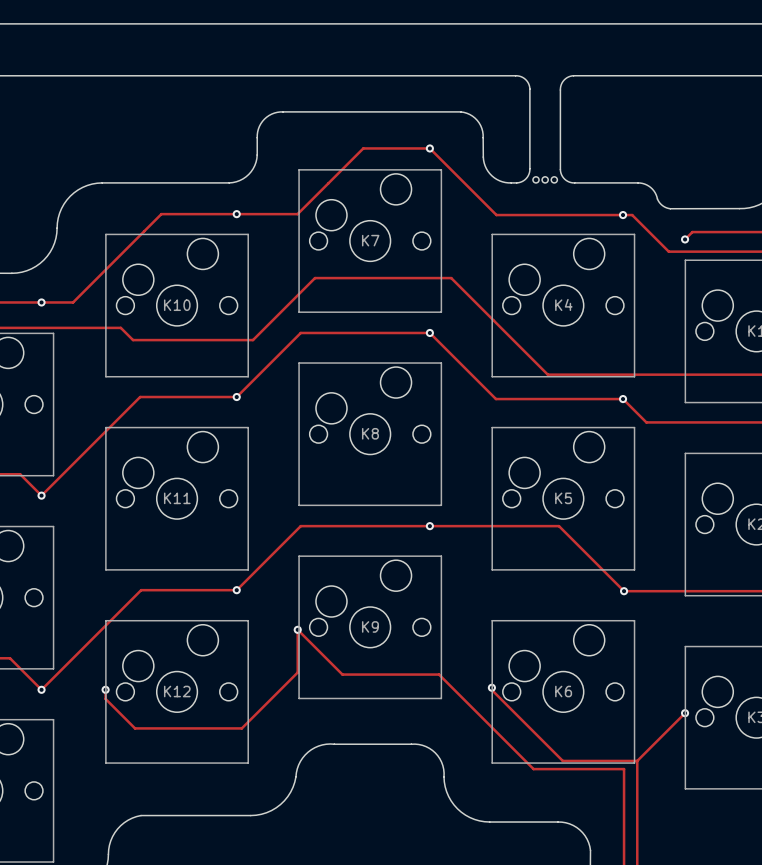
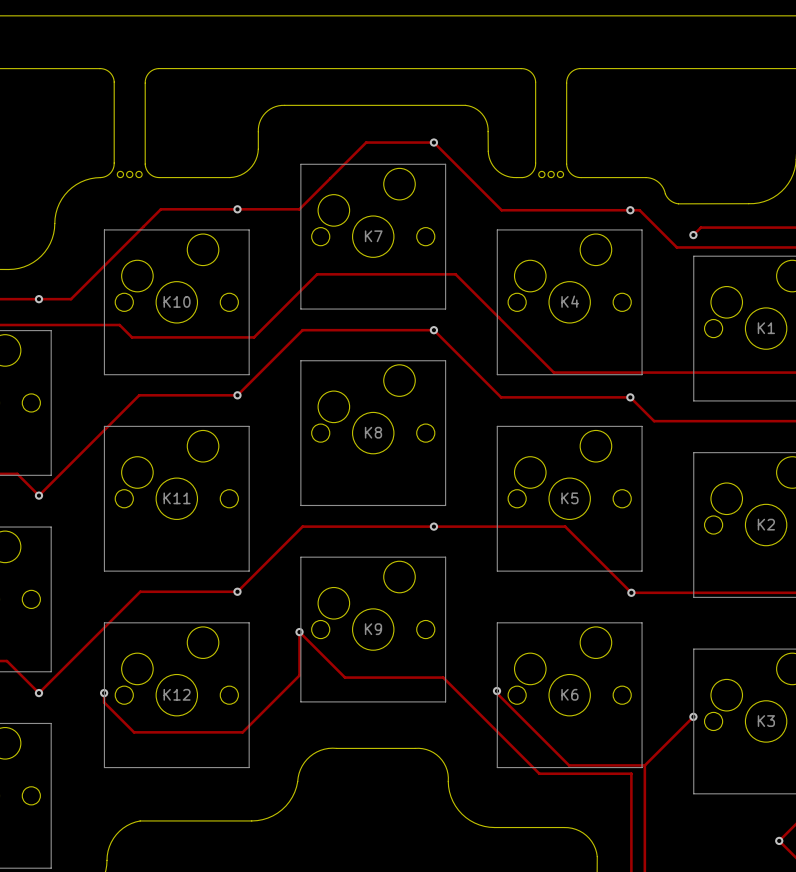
board edge: (101, 75) (515, 75) -> (229, 177) (157, 177) (148, 172) (145, 164) (145, 83) (150, 71) (158, 68) (521, 68)
round board edge: none -> [116, 170, 125, 179]
round board edge: none -> [126, 170, 134, 179]
round board edge: none -> [135, 170, 143, 179]
board edge: (102, 182) (229, 182) -> (100, 177) (109, 174) (114, 164) (114, 82) (109, 72) (99, 68)

